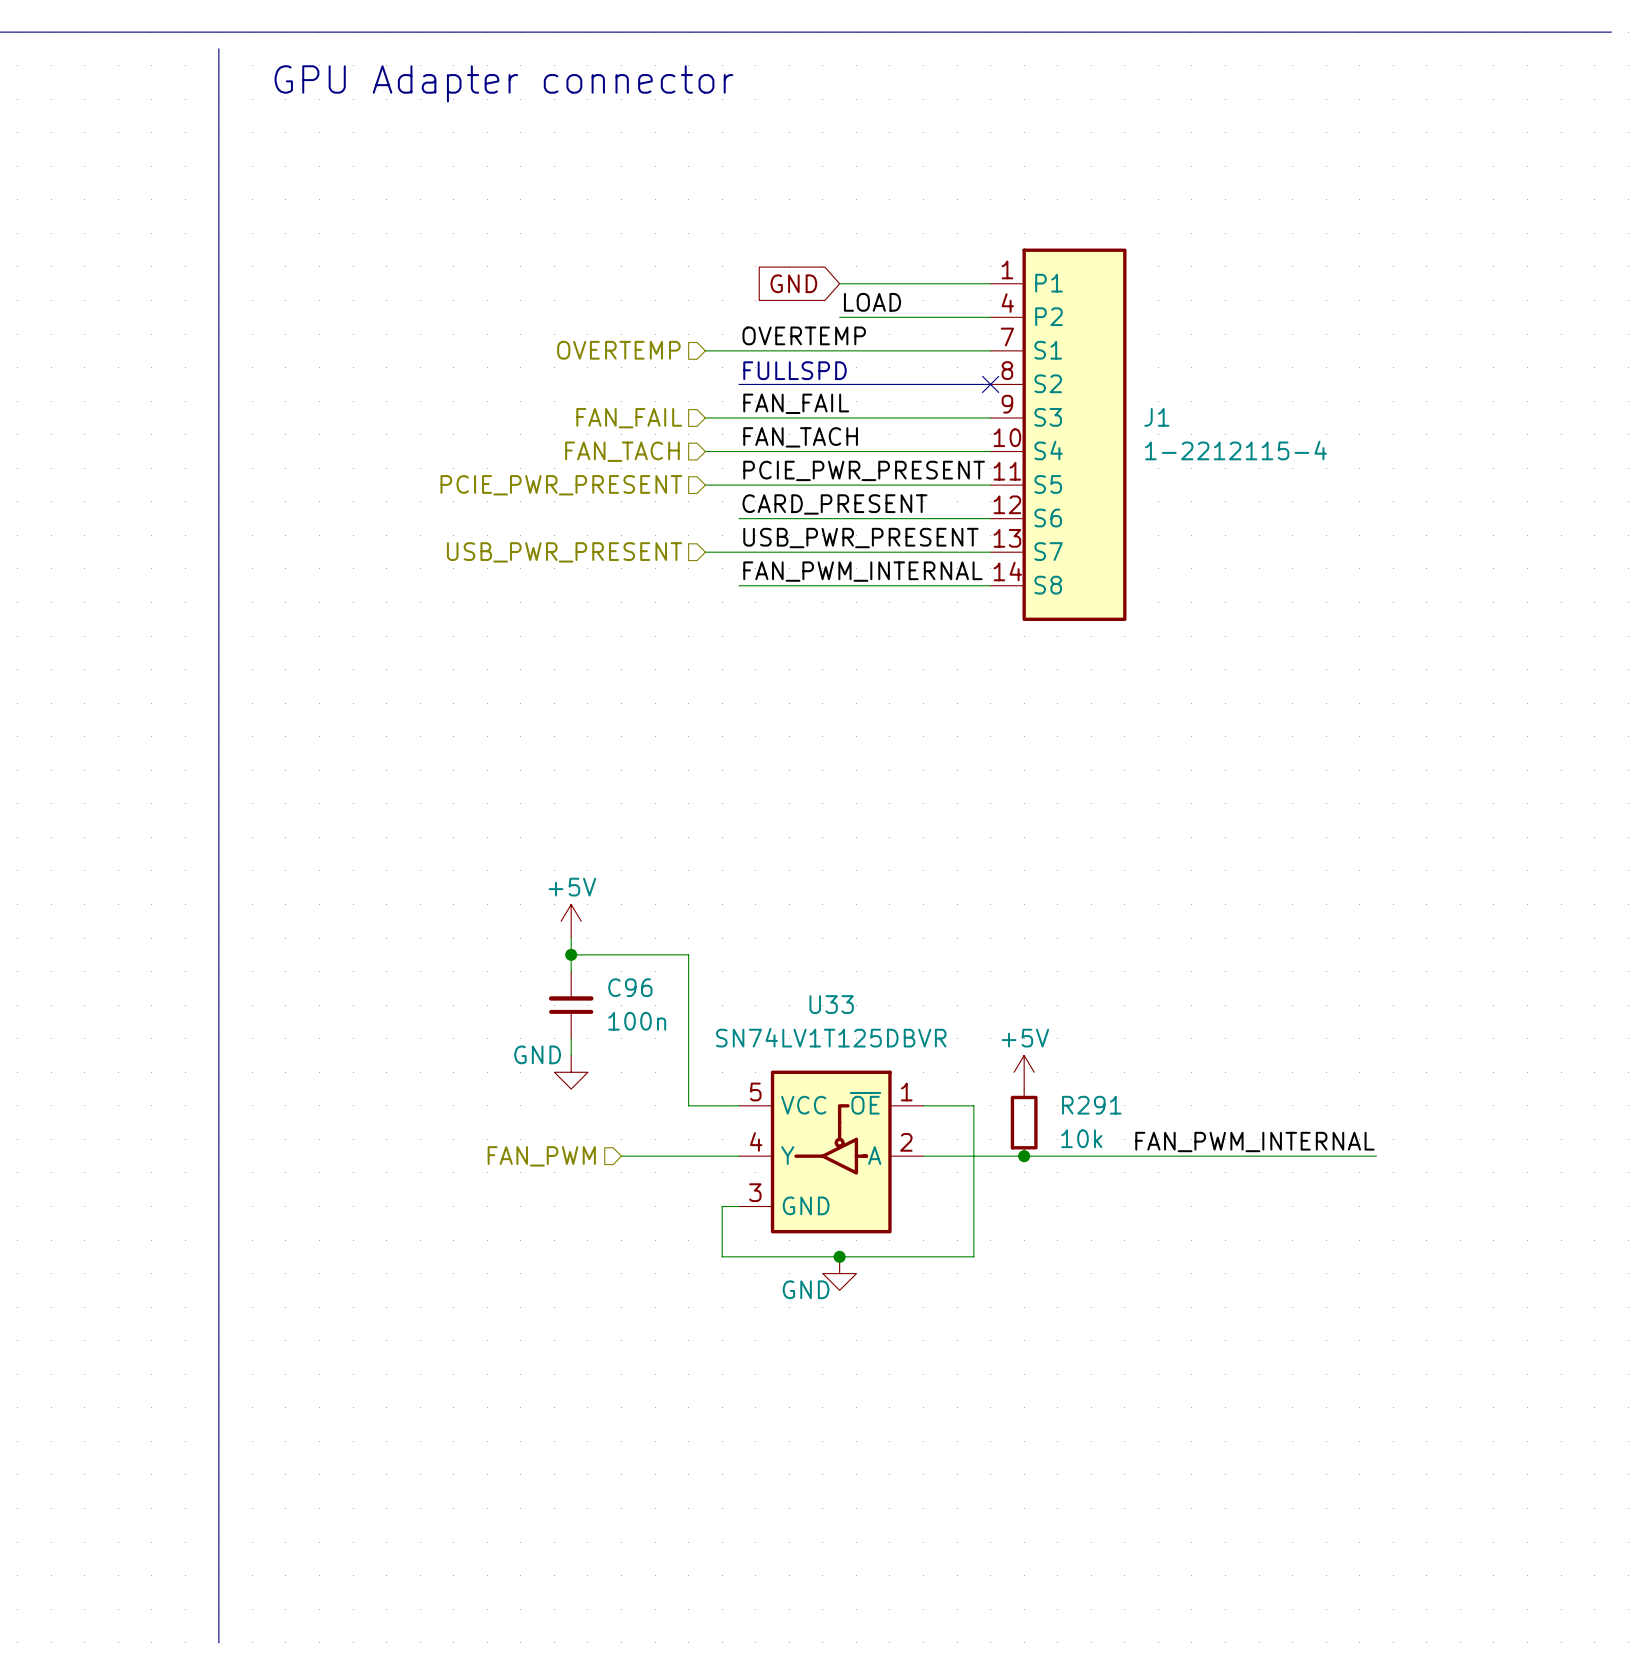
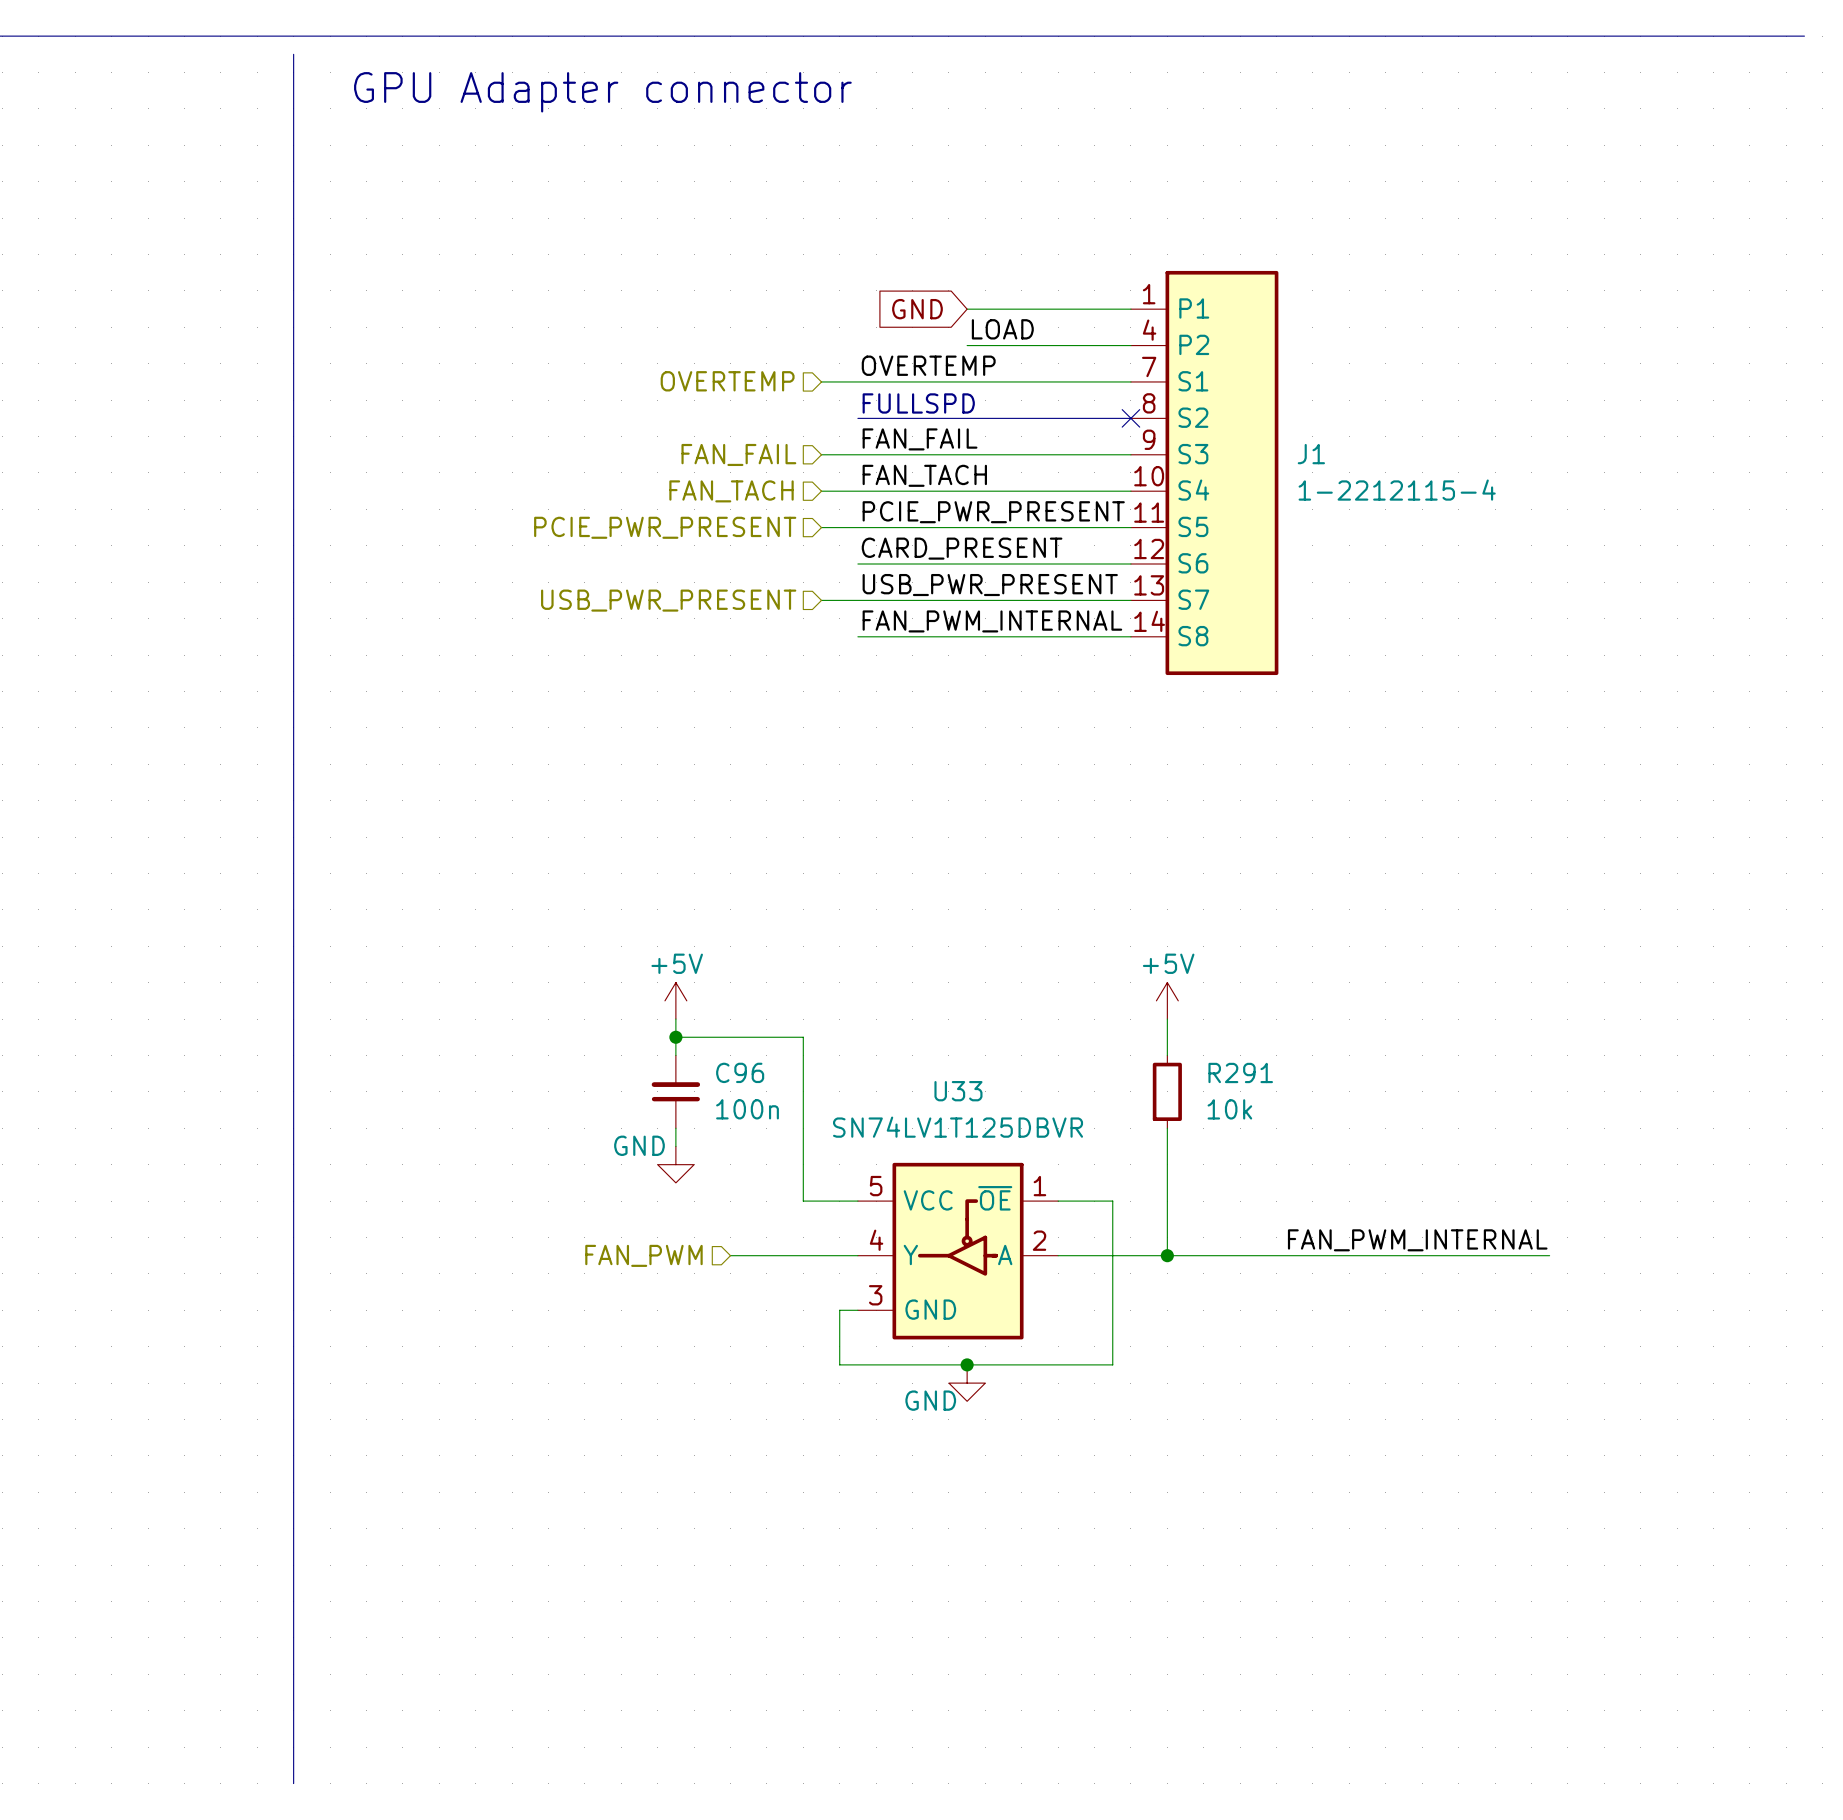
wire: none -> (1167, 1019) (1167, 1055)
wire: none -> (1167, 1128) (1167, 1255)
power symbol position: +5V (1024, 1072) -> +5V (1167, 1000)
R291 position: (1024, 1122) -> (1167, 1091)

